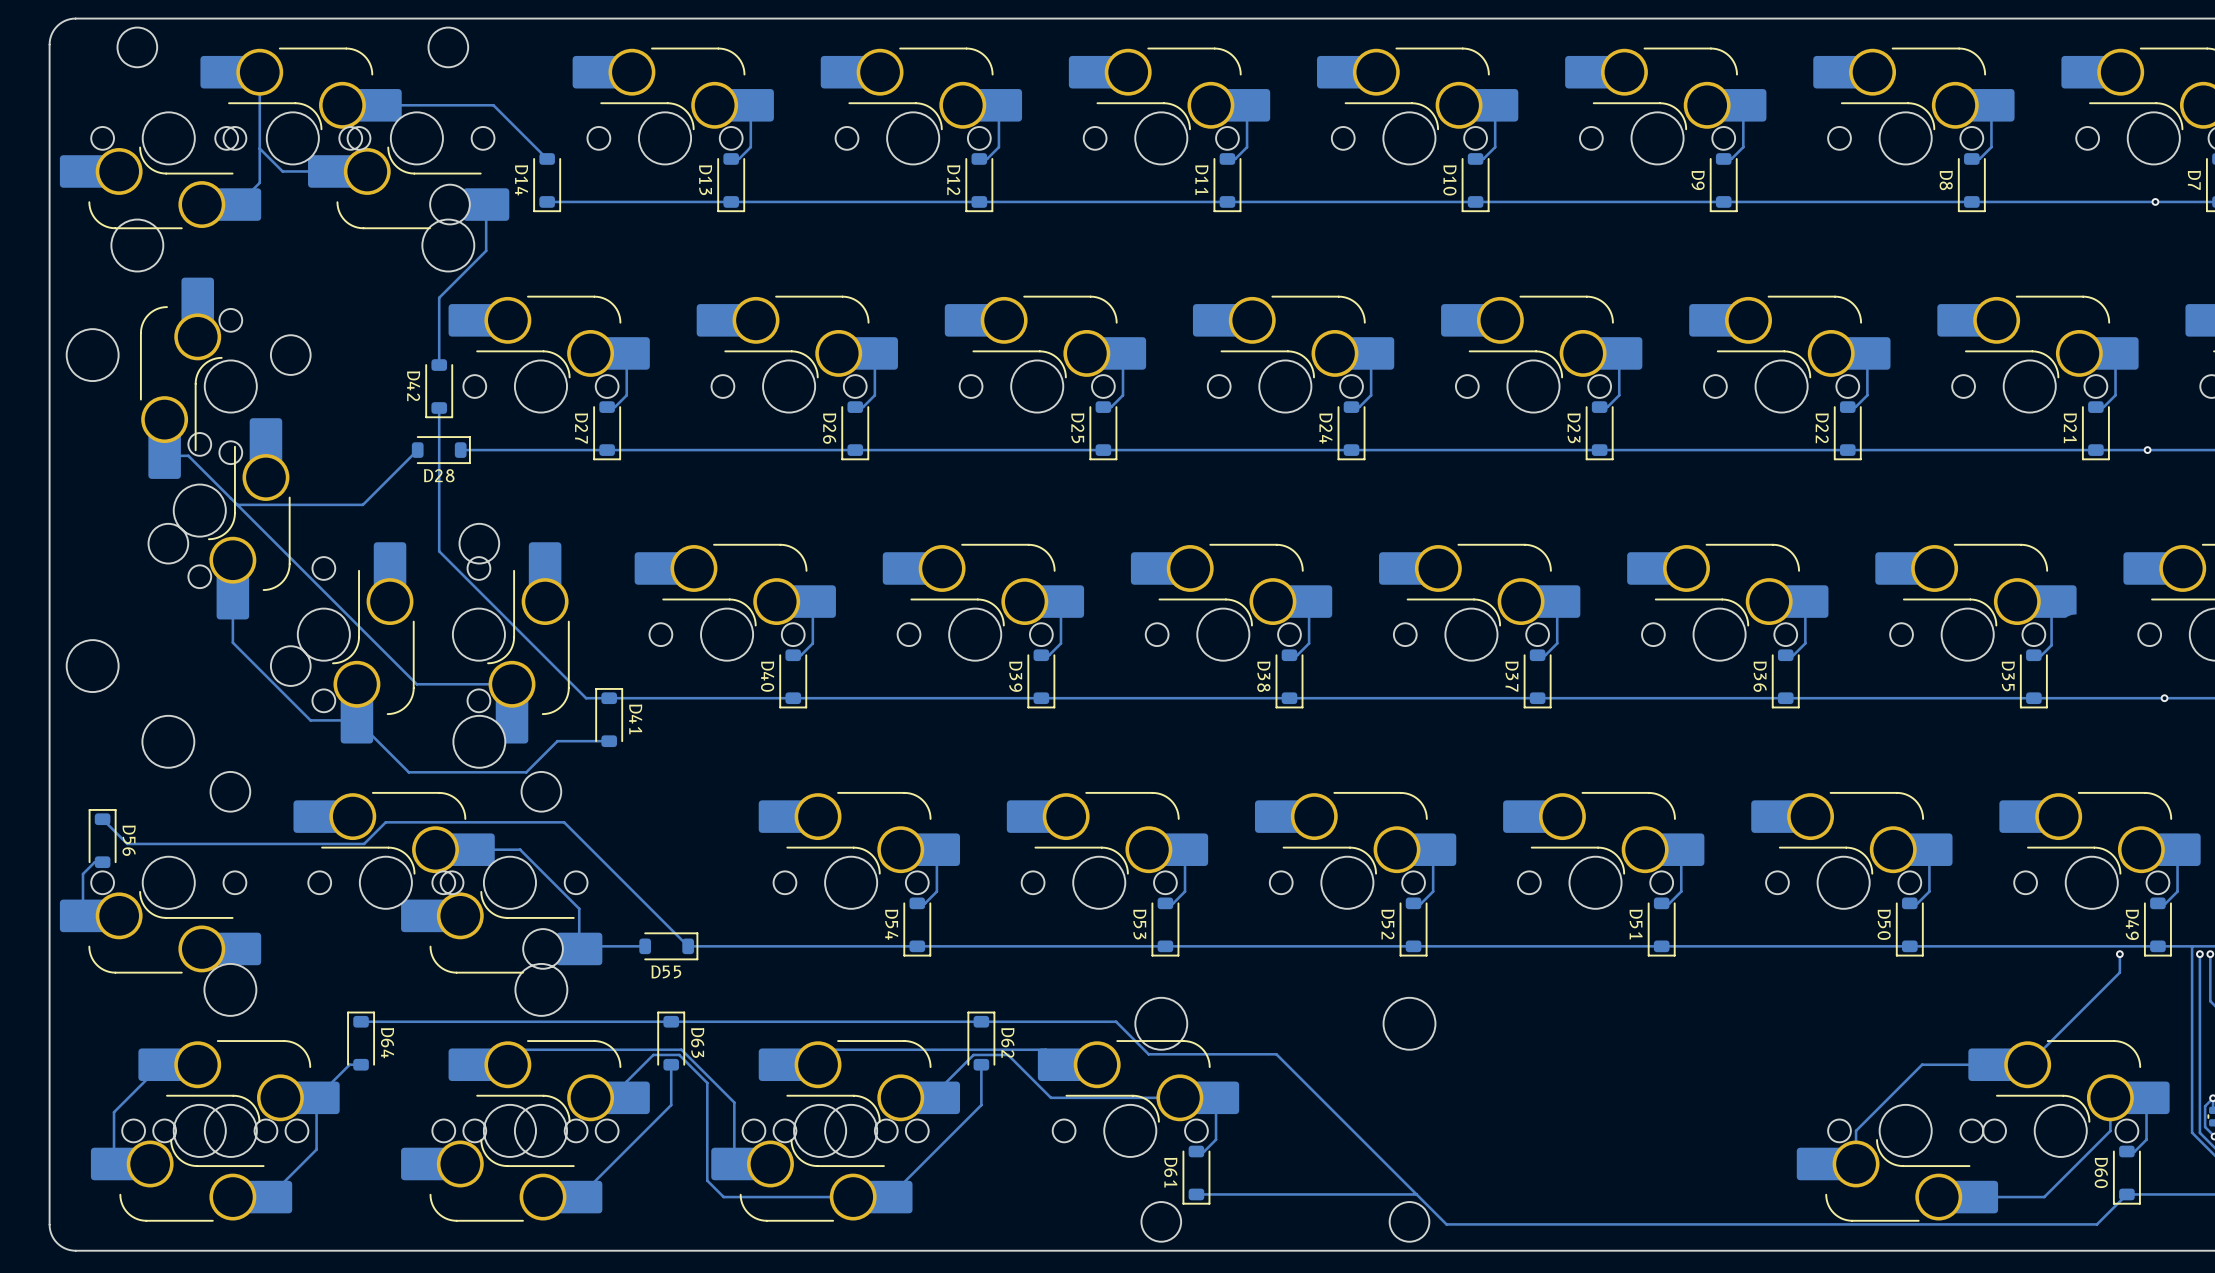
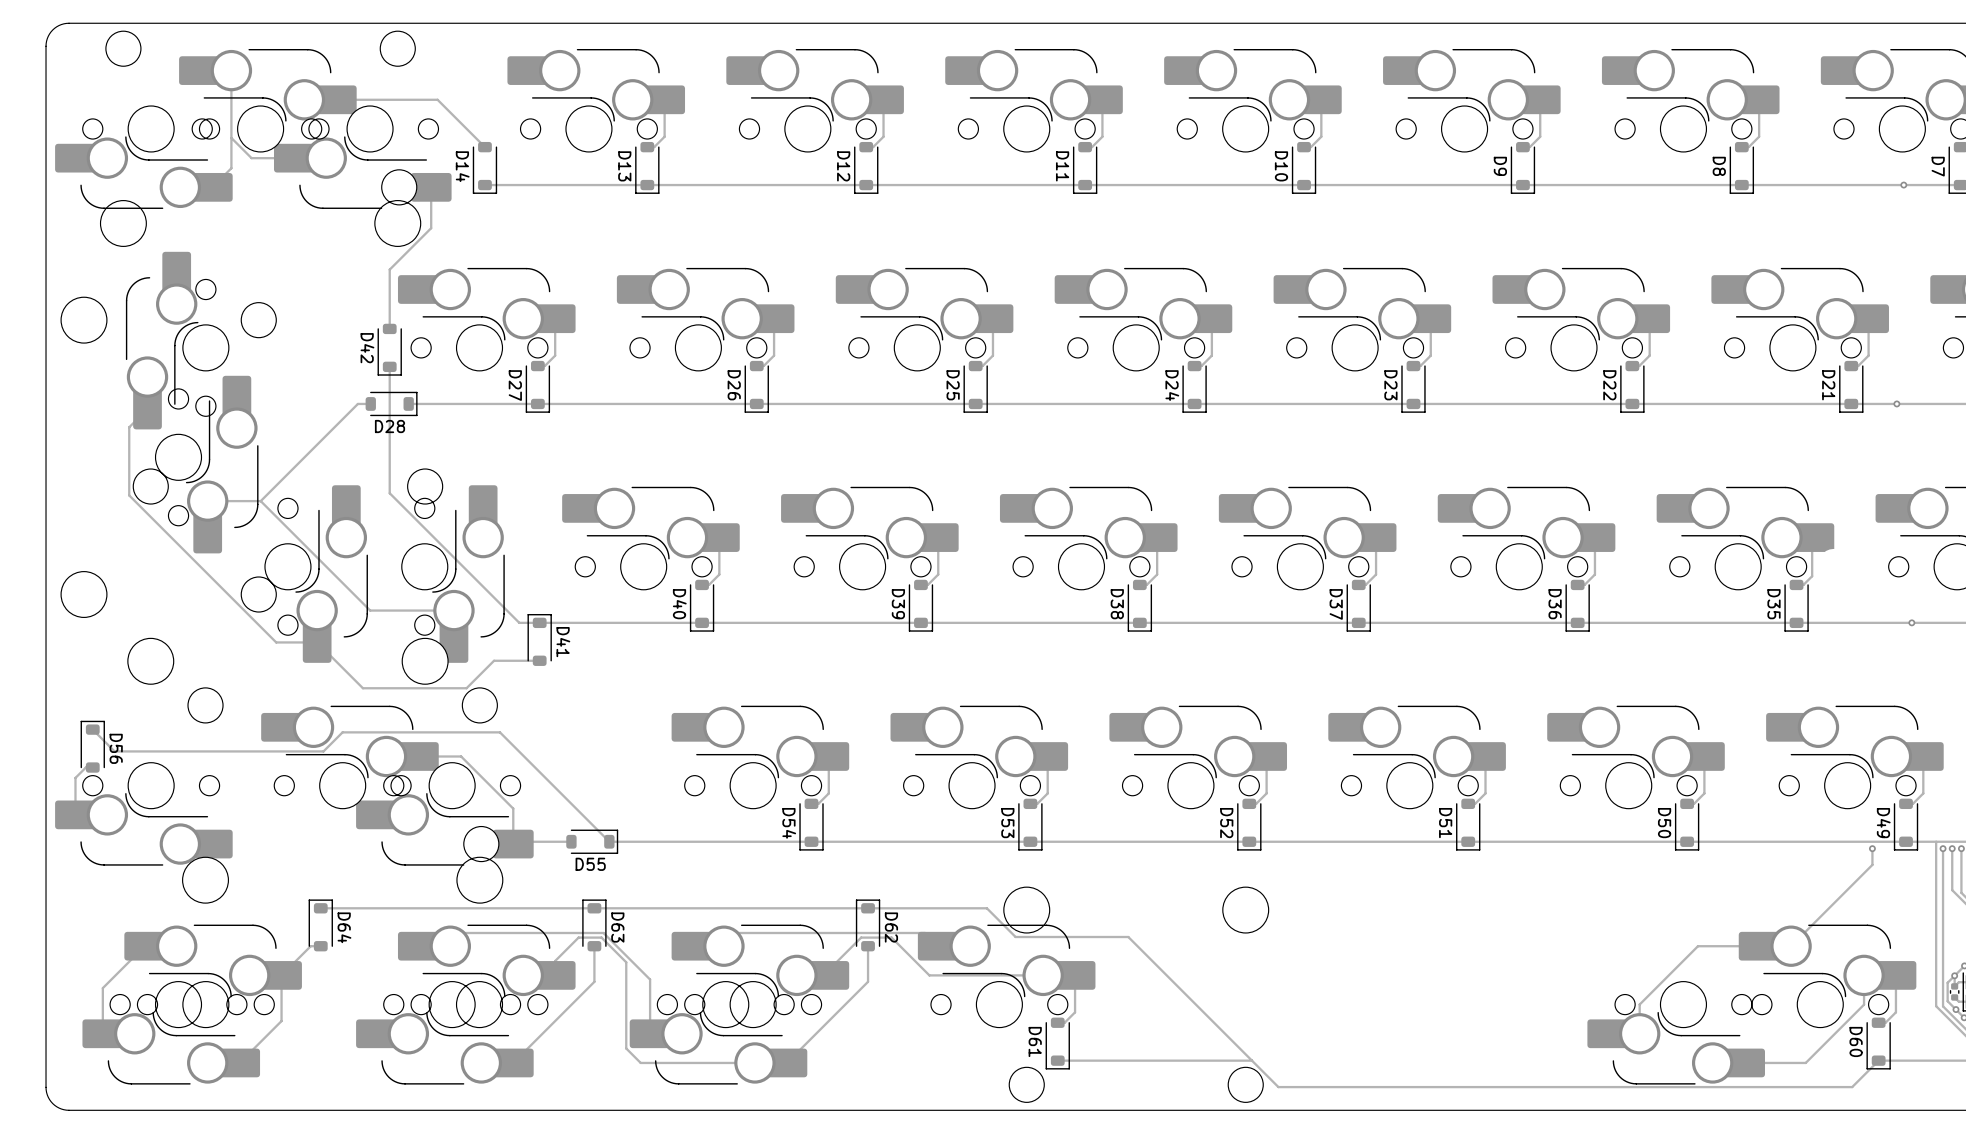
track: (417, 450) (362, 504) (237, 504) -> (370, 403) (357, 403) (260, 501)
track: (164, 455) (188, 455) (417, 684) -> (260, 501) (370, 610)
track: none -> (260, 501) (207, 501)
track: (232, 596) (232, 642) -> (147, 409) (129, 427) (129, 495) (207, 573)

